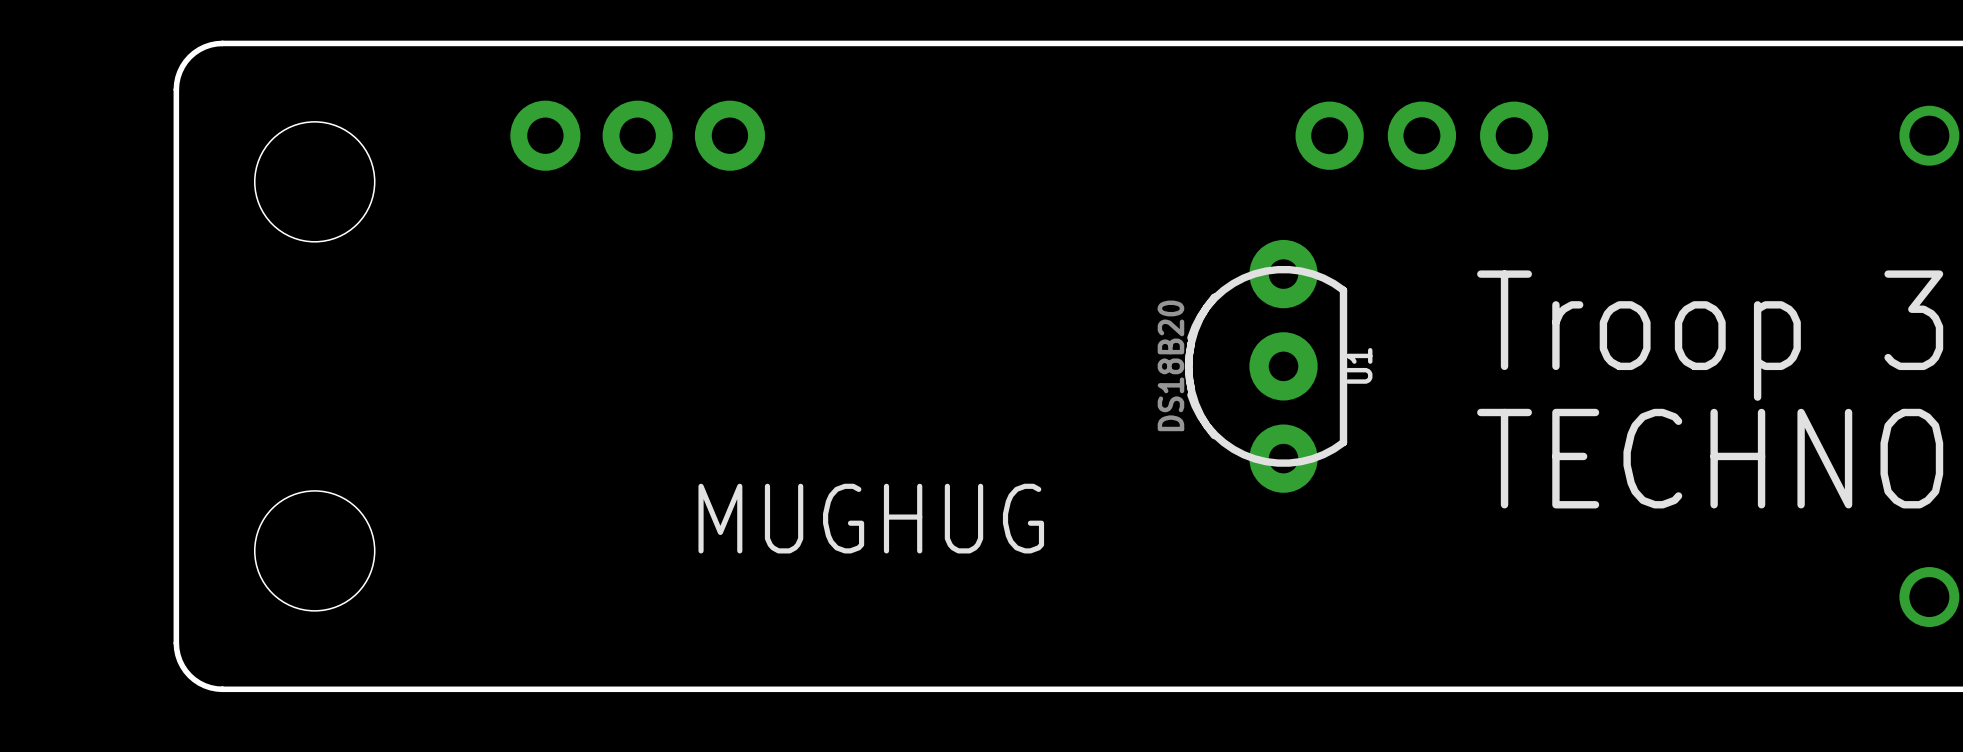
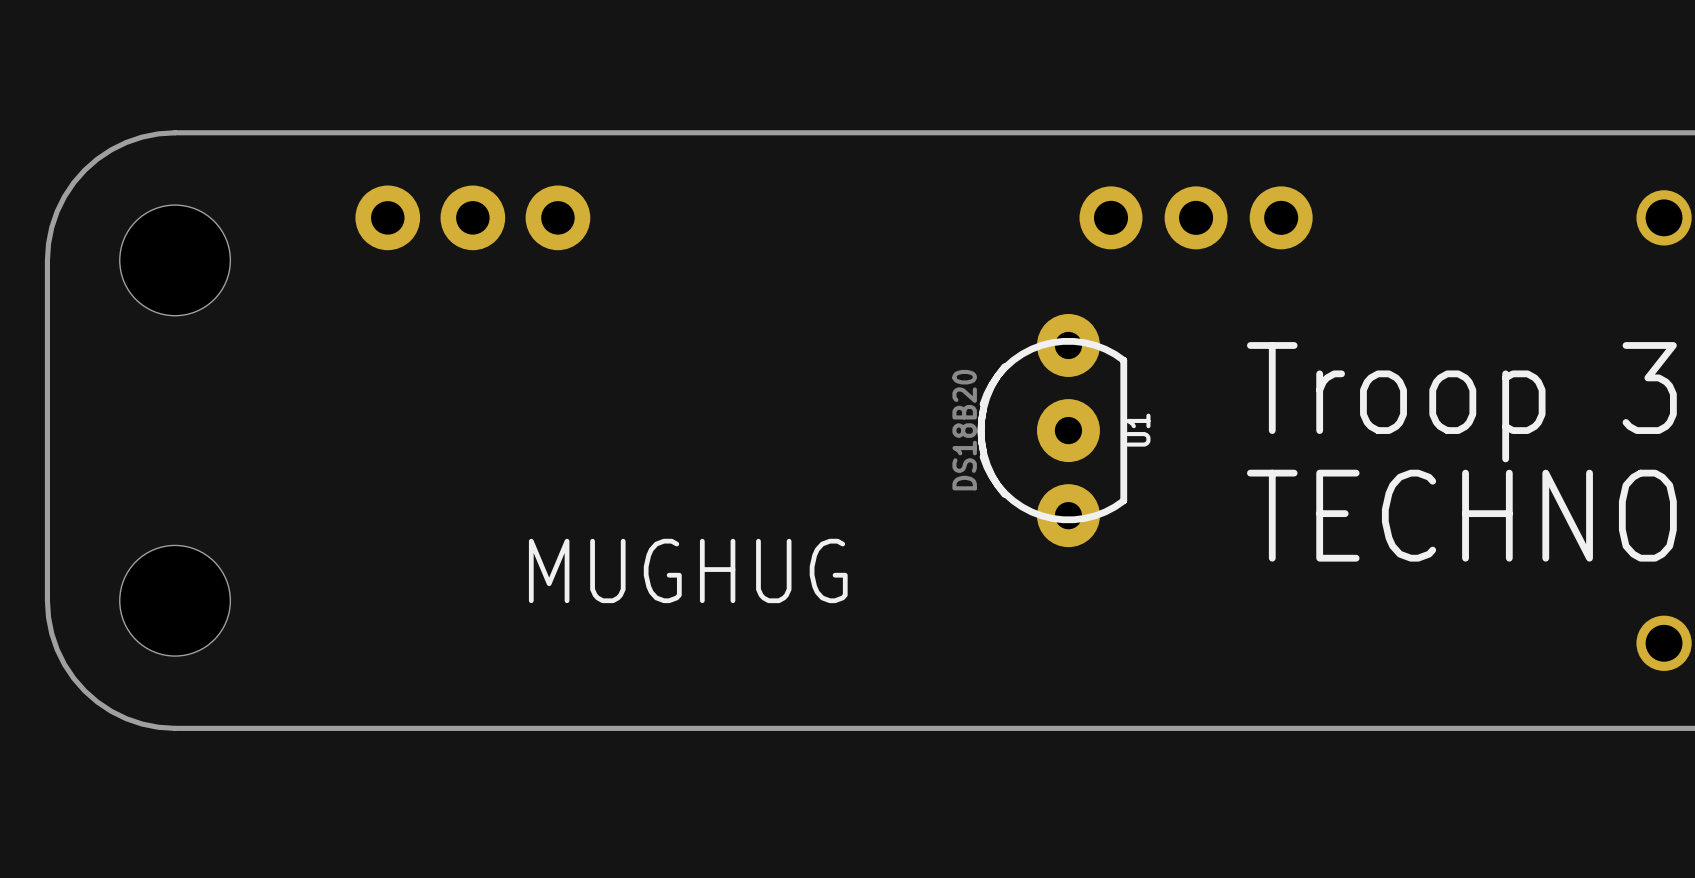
board edge: (314, 43) (216, 43) (199, 49) (189, 56) (182, 66) (176, 83) (176, 181) -> (175, 132) (142, 137) (126, 142) (111, 149) (84, 170) (64, 196) (57, 211) (51, 227) (47, 260)
board edge: (176, 550) (176, 649) (182, 666) (189, 675) (199, 683) (216, 688) (314, 689) -> (47, 600) (51, 633) (57, 649) (64, 664) (84, 690) (111, 711) (126, 718) (142, 724) (175, 728)

